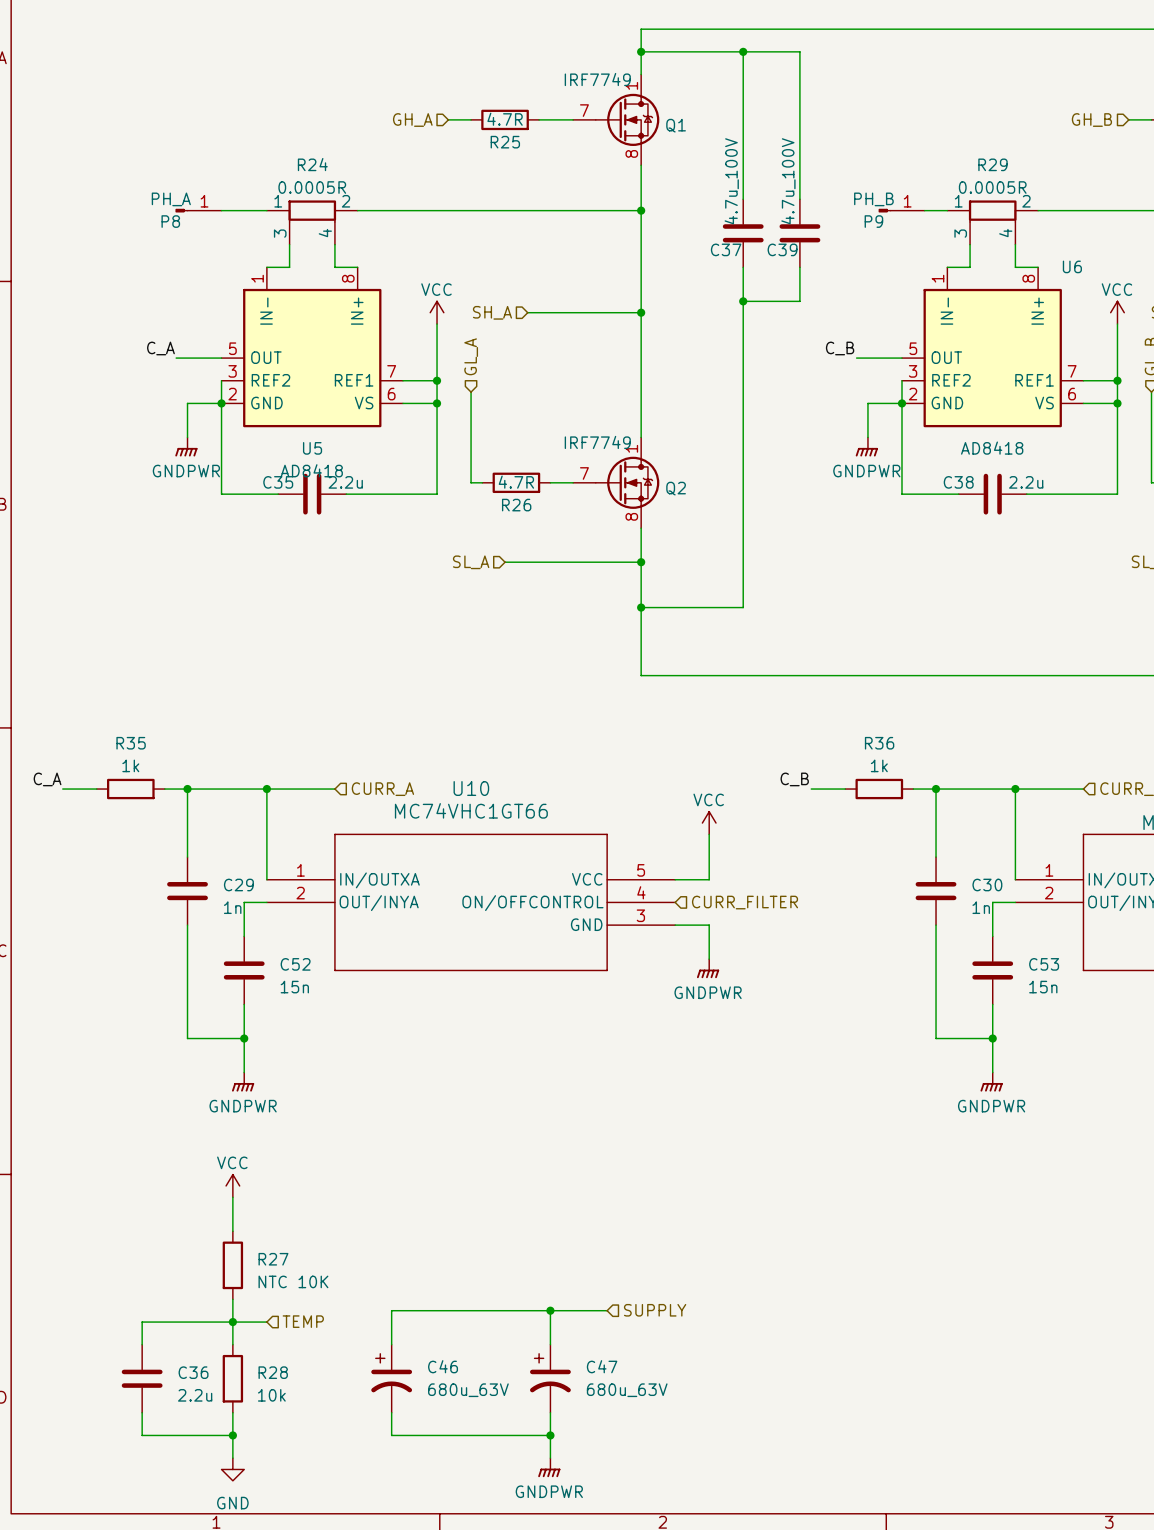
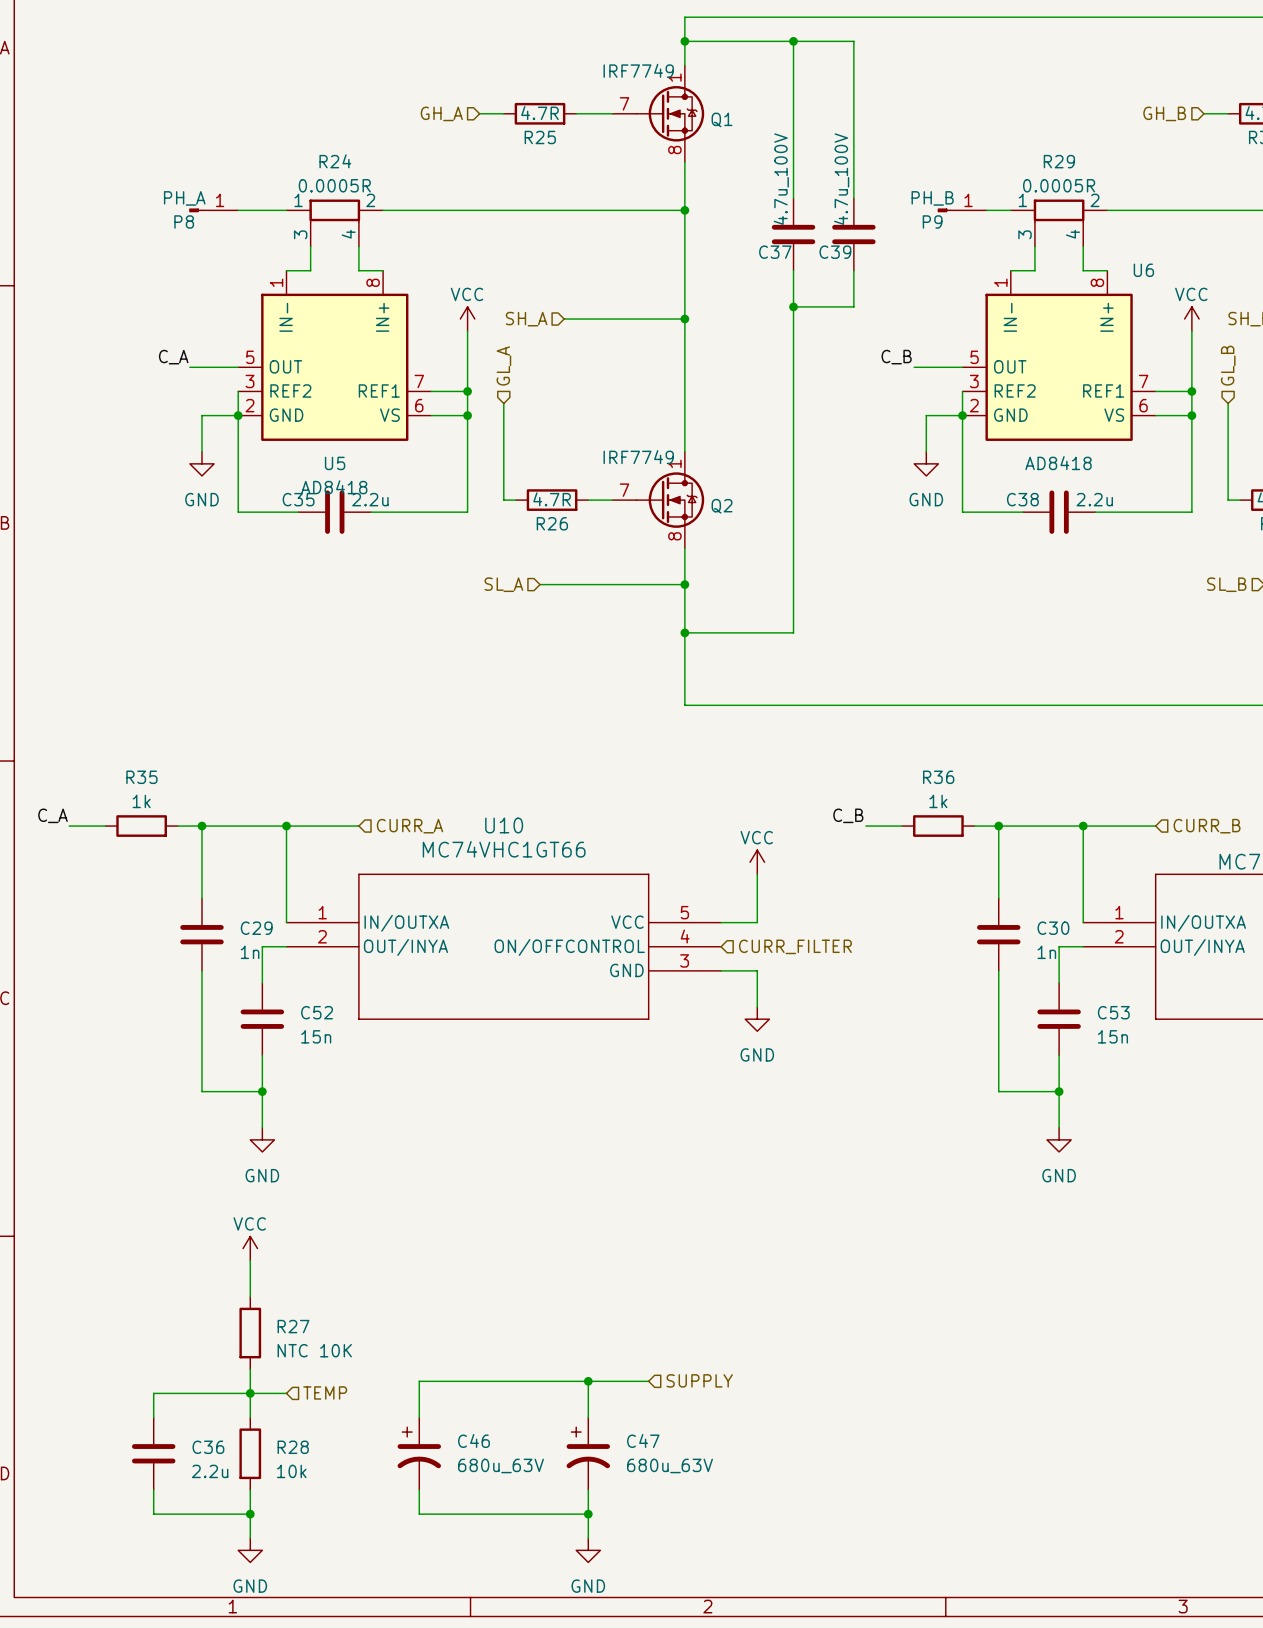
power symbol: GNDPWR (186, 446) -> GND (201, 463)
power symbol: GNDPWR (866, 446) -> GND (926, 463)
power symbol: GNDPWR (708, 968) -> GND (757, 1019)
power symbol: GNDPWR (243, 1082) -> GND (262, 1139)
power symbol: GNDPWR (991, 1082) -> GND (1059, 1139)
power symbol: GNDPWR (549, 1467) -> GND (588, 1550)

